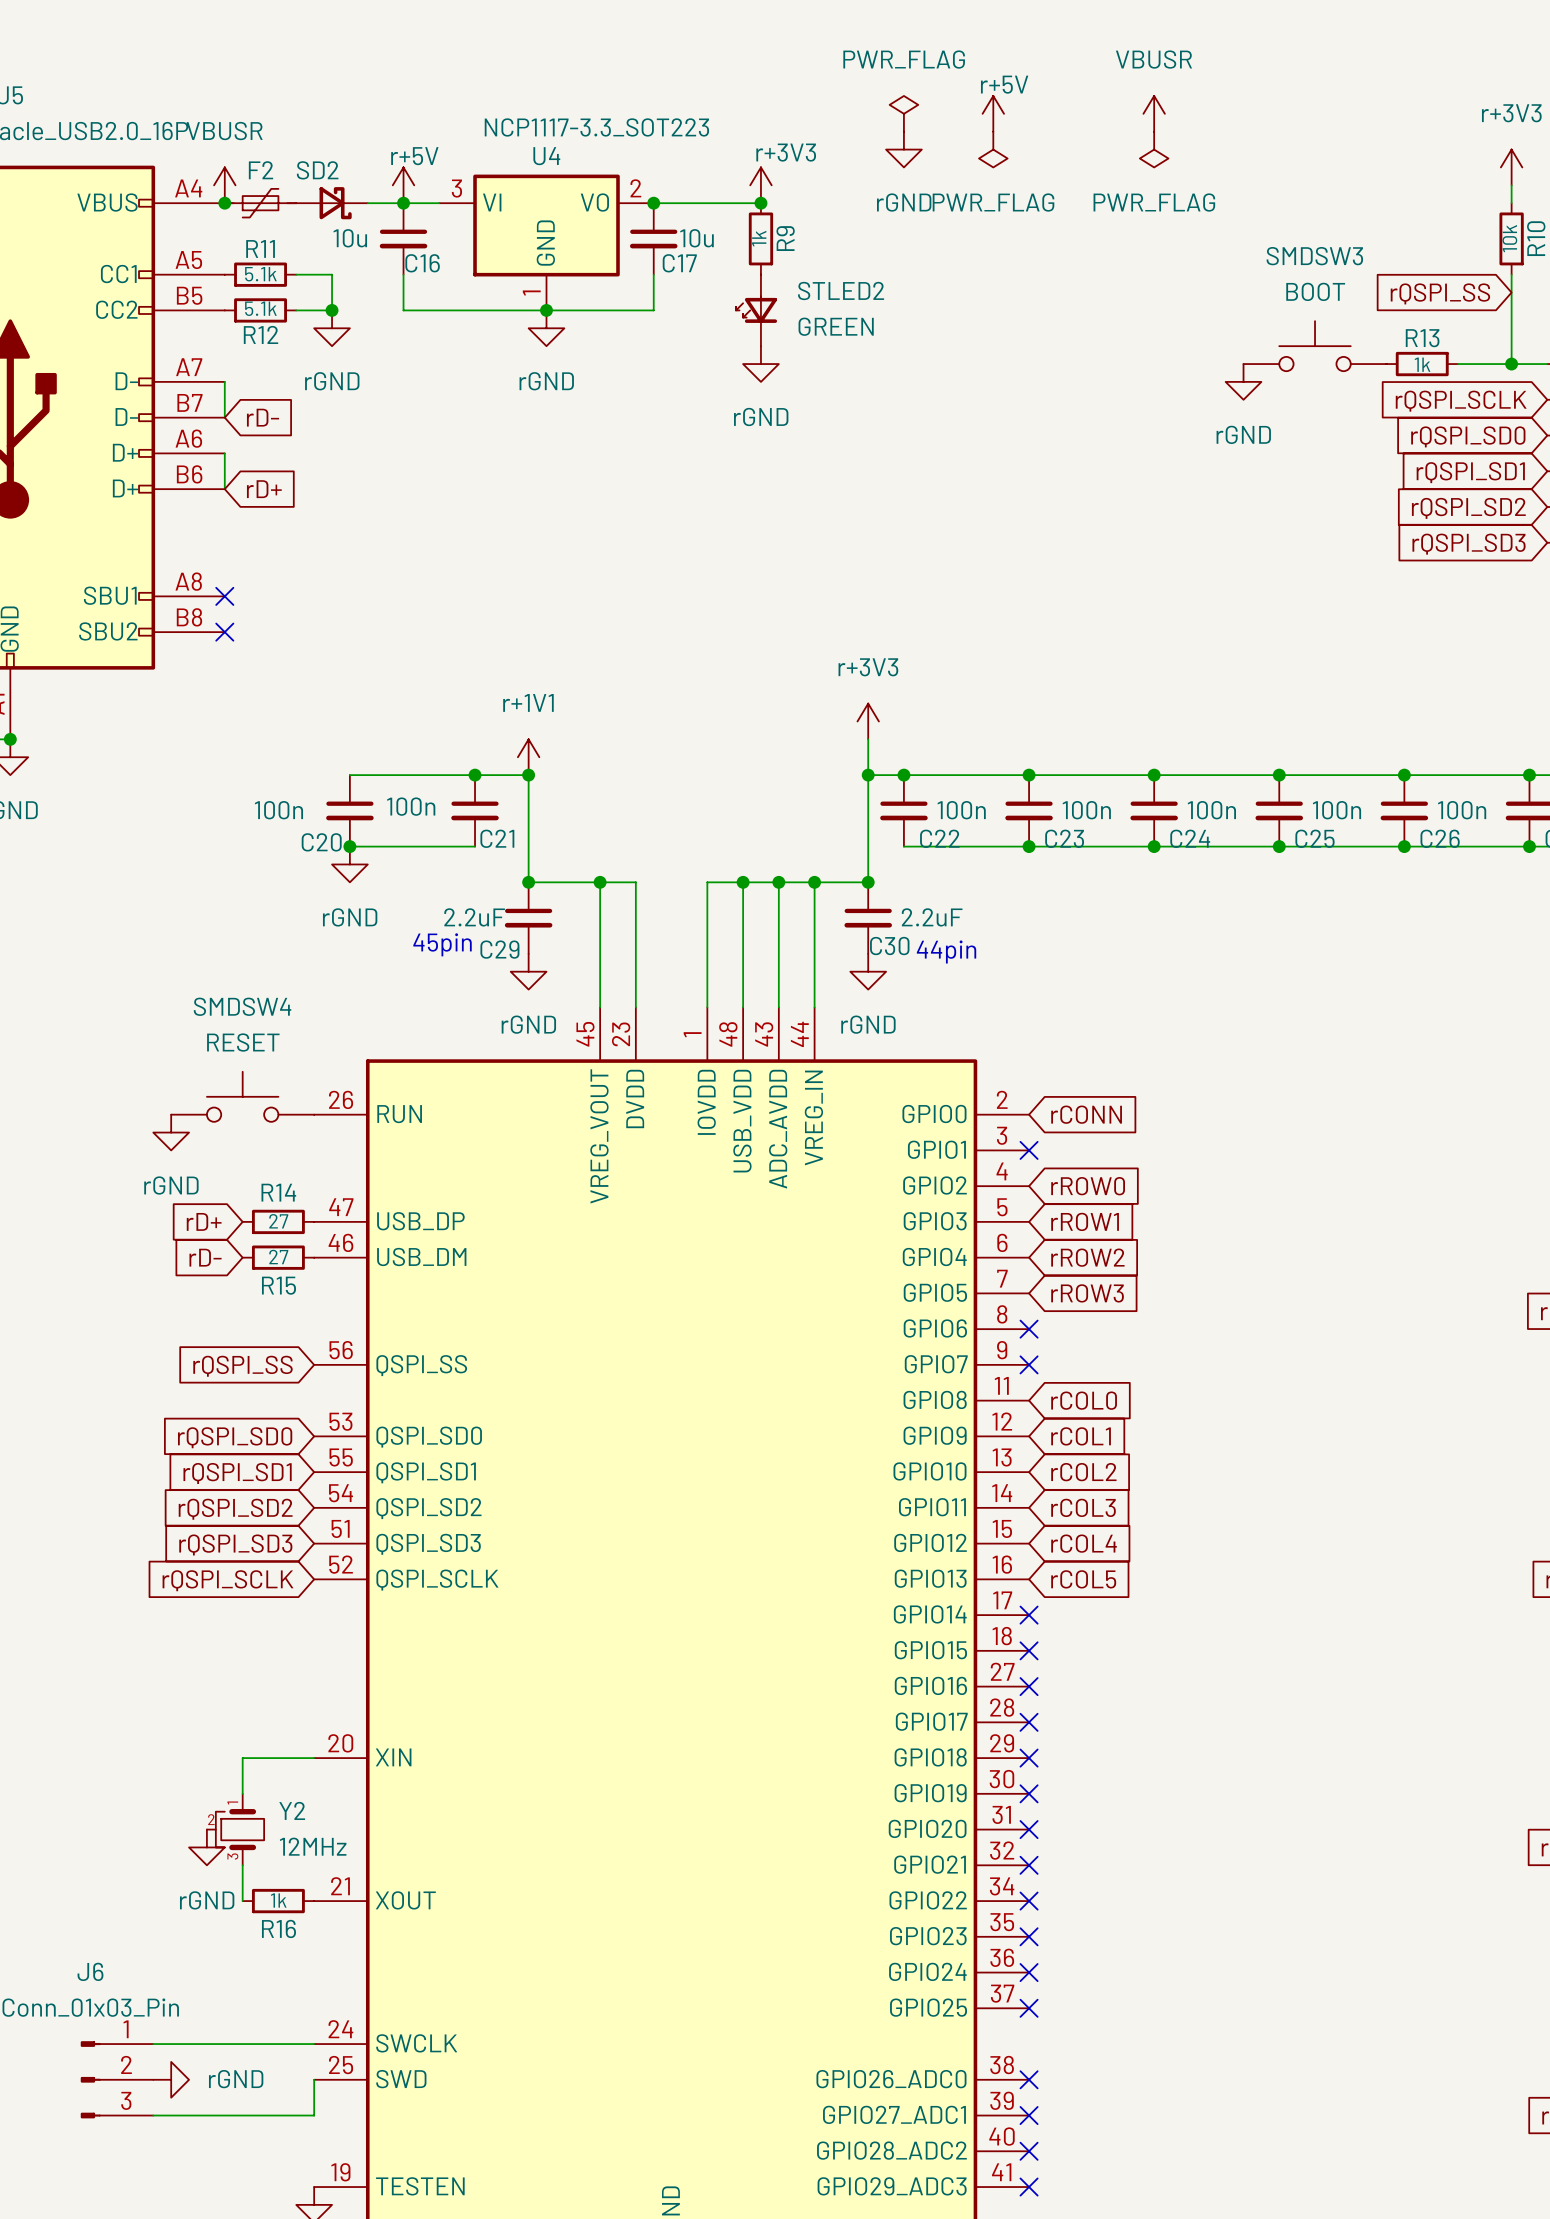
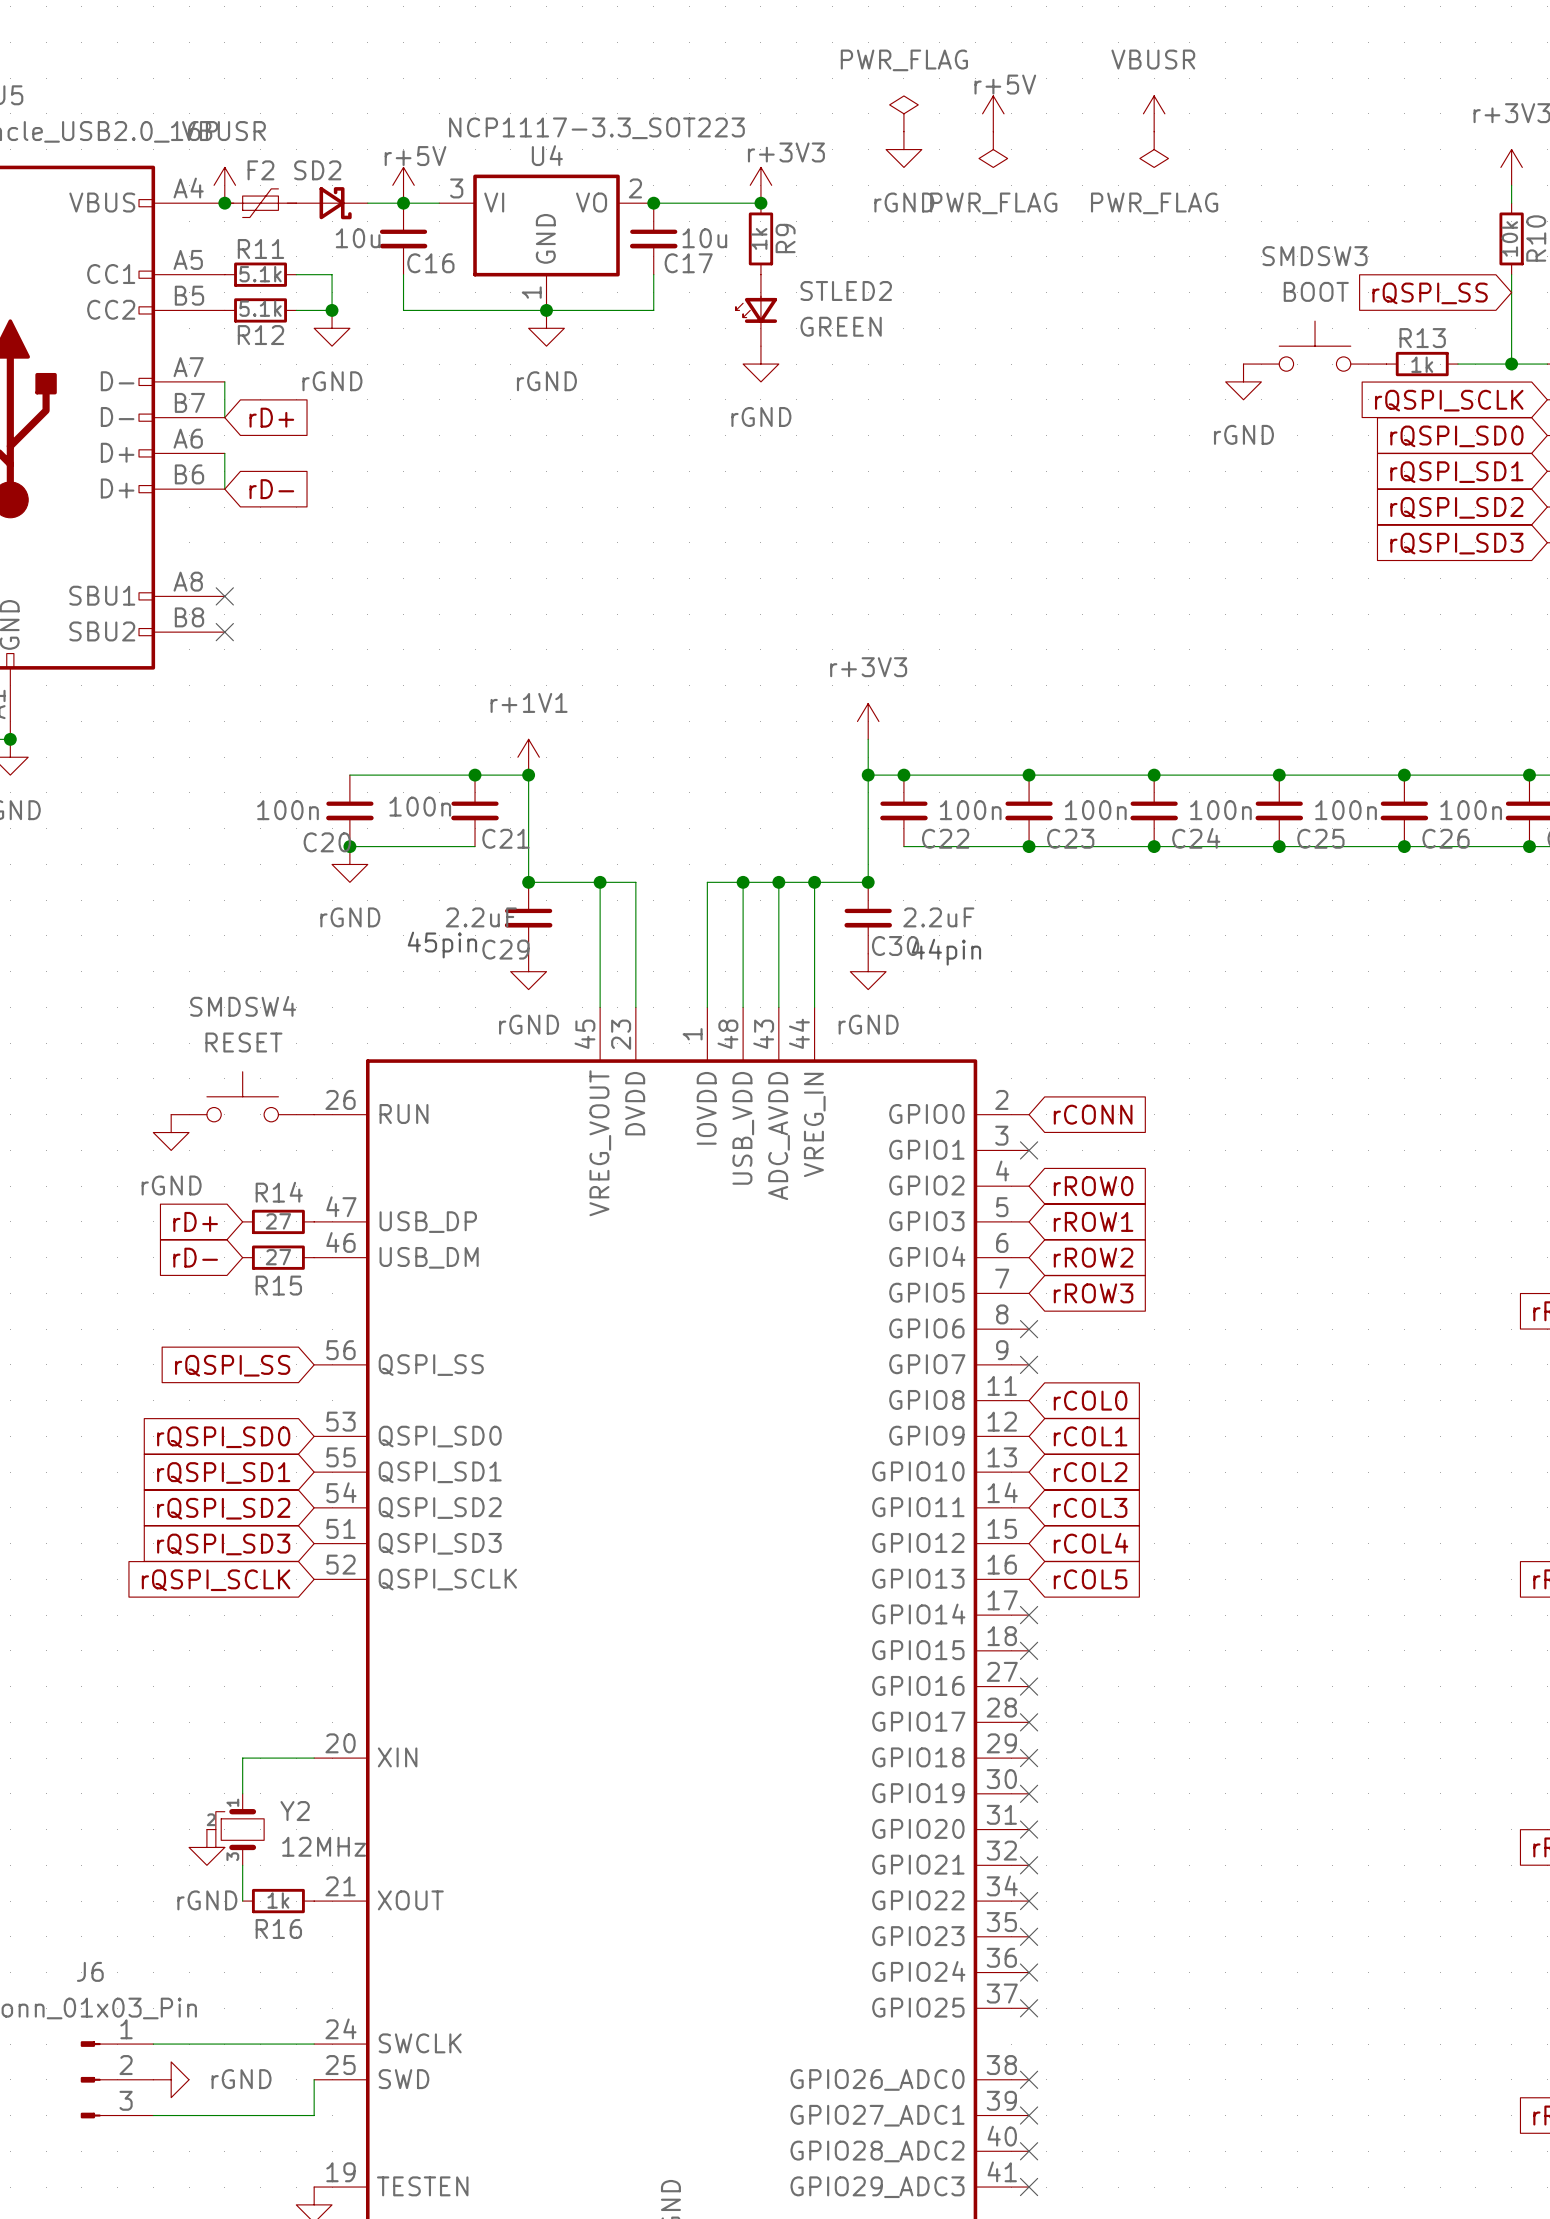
global label: rD- (262, 417) -> rD+ (271, 417)
global label: rD+ (264, 489) -> rD- (271, 489)

